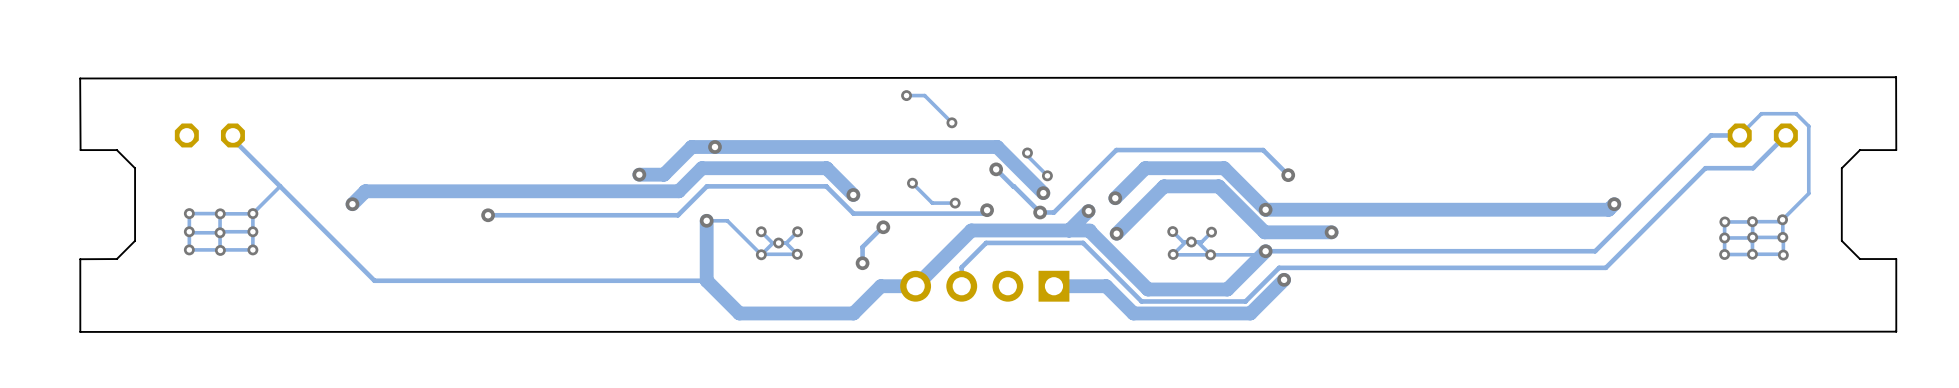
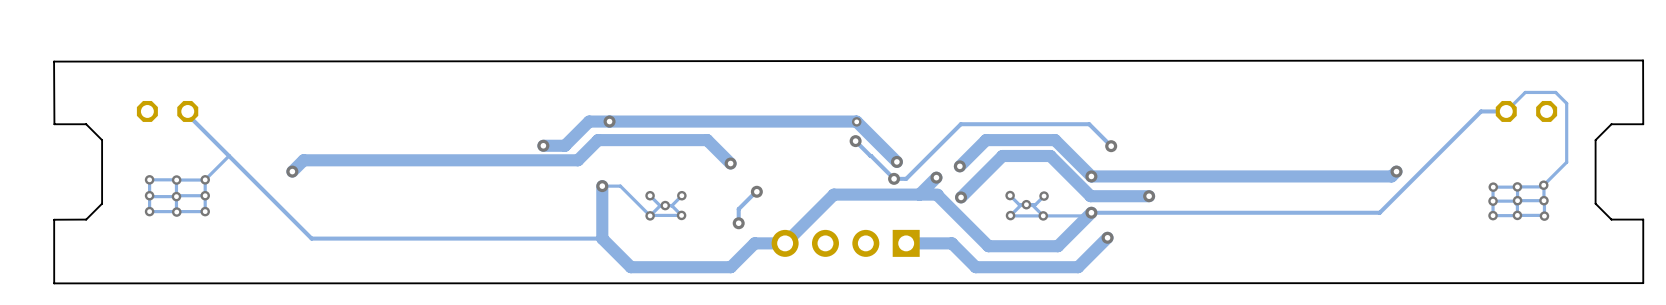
track: (906, 95) (924, 95) (951, 122) -> none
via: (906, 95) -> none
via: (951, 122) -> none
track: (1785, 135) (1753, 168) (1705, 168) (1605, 267) (1279, 267) (1245, 301) (1141, 301) (1083, 242) (986, 242) (961, 267) (961, 286) -> none
via: none -> (856, 121)
track: (1027, 152) (1027, 155) (1047, 175) -> none
via: (1027, 152) -> none
via: (1047, 175) -> none
track: (912, 183) (932, 203) (955, 203) -> none
via: (912, 183) -> none
via: (955, 203) -> none
track: (987, 210) (983, 213) (853, 213) (826, 186) (706, 186) (678, 215) (488, 215) -> none
via: (987, 210) -> none
via: (488, 215) -> none

